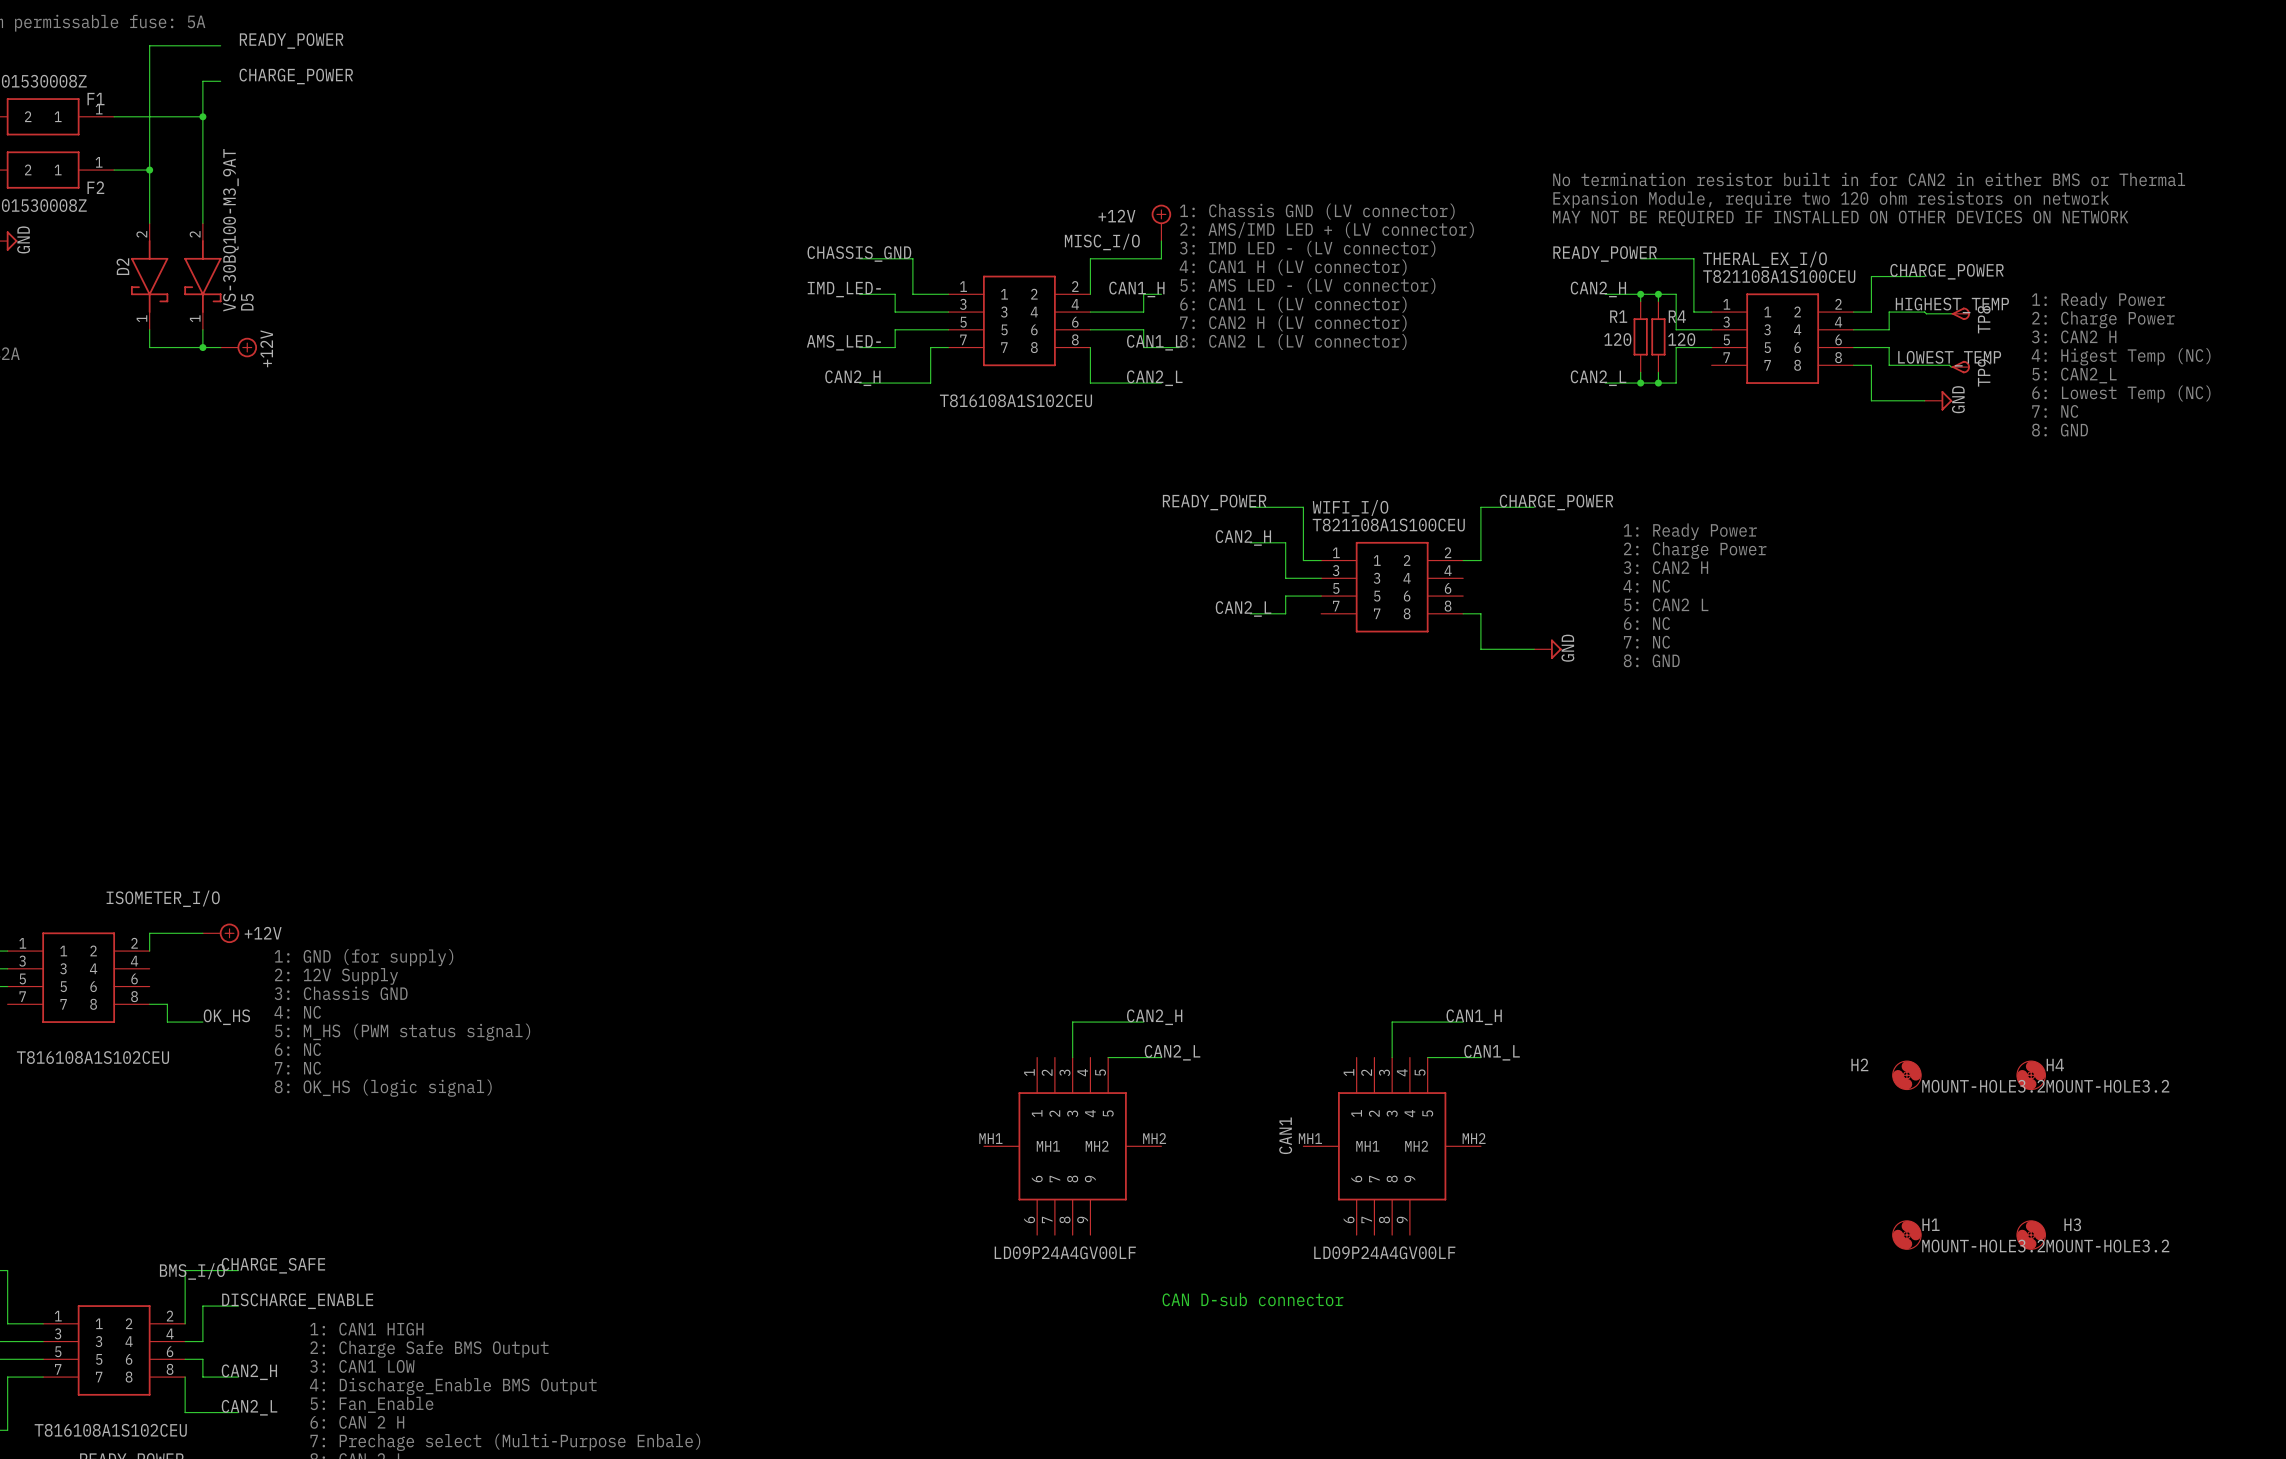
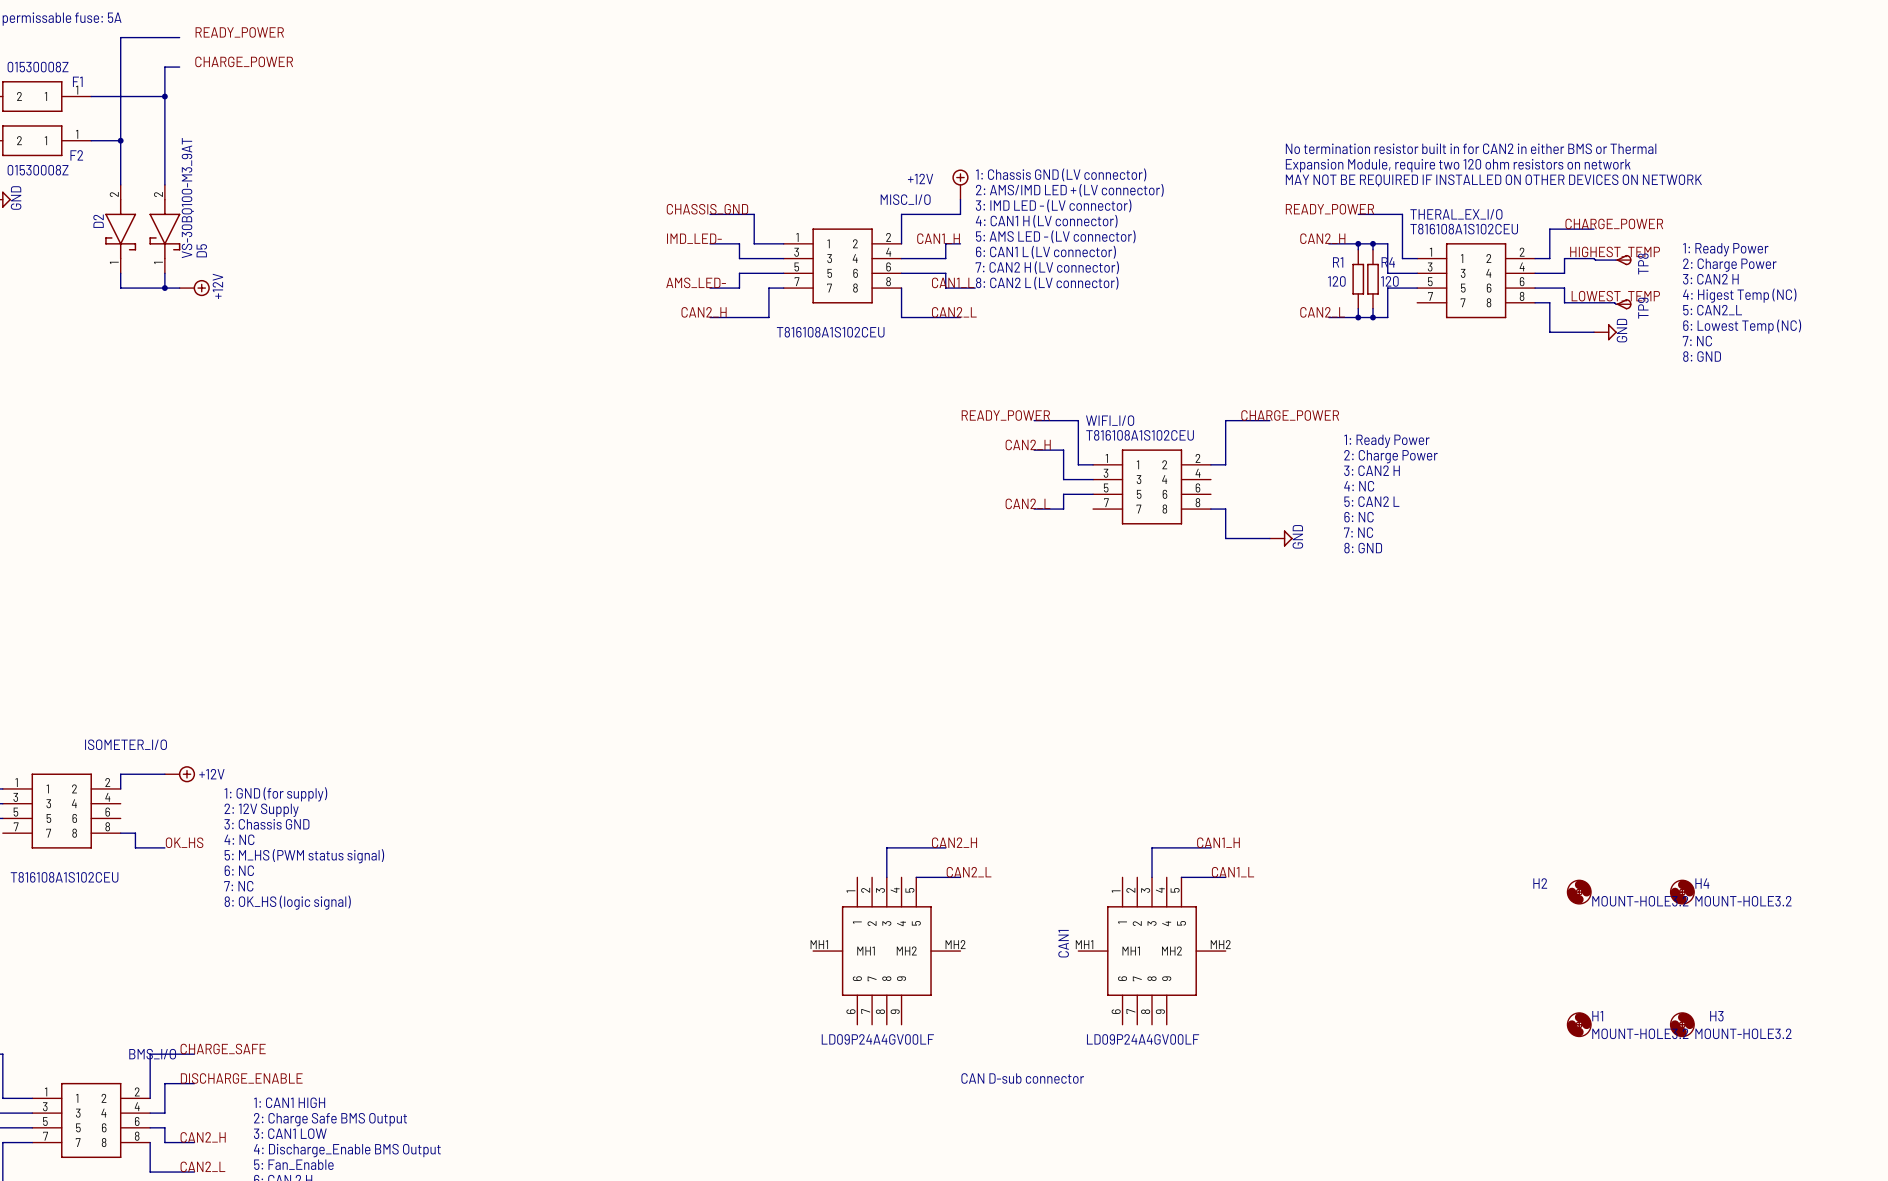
THERAL_EX_I/O value: T821108A1S100CEU (1779, 276) -> T816108A1S102CEU (1464, 229)
WIFI_I/O value: T821108A1S100CEU (1388, 525) -> T816108A1S102CEU (1140, 435)

